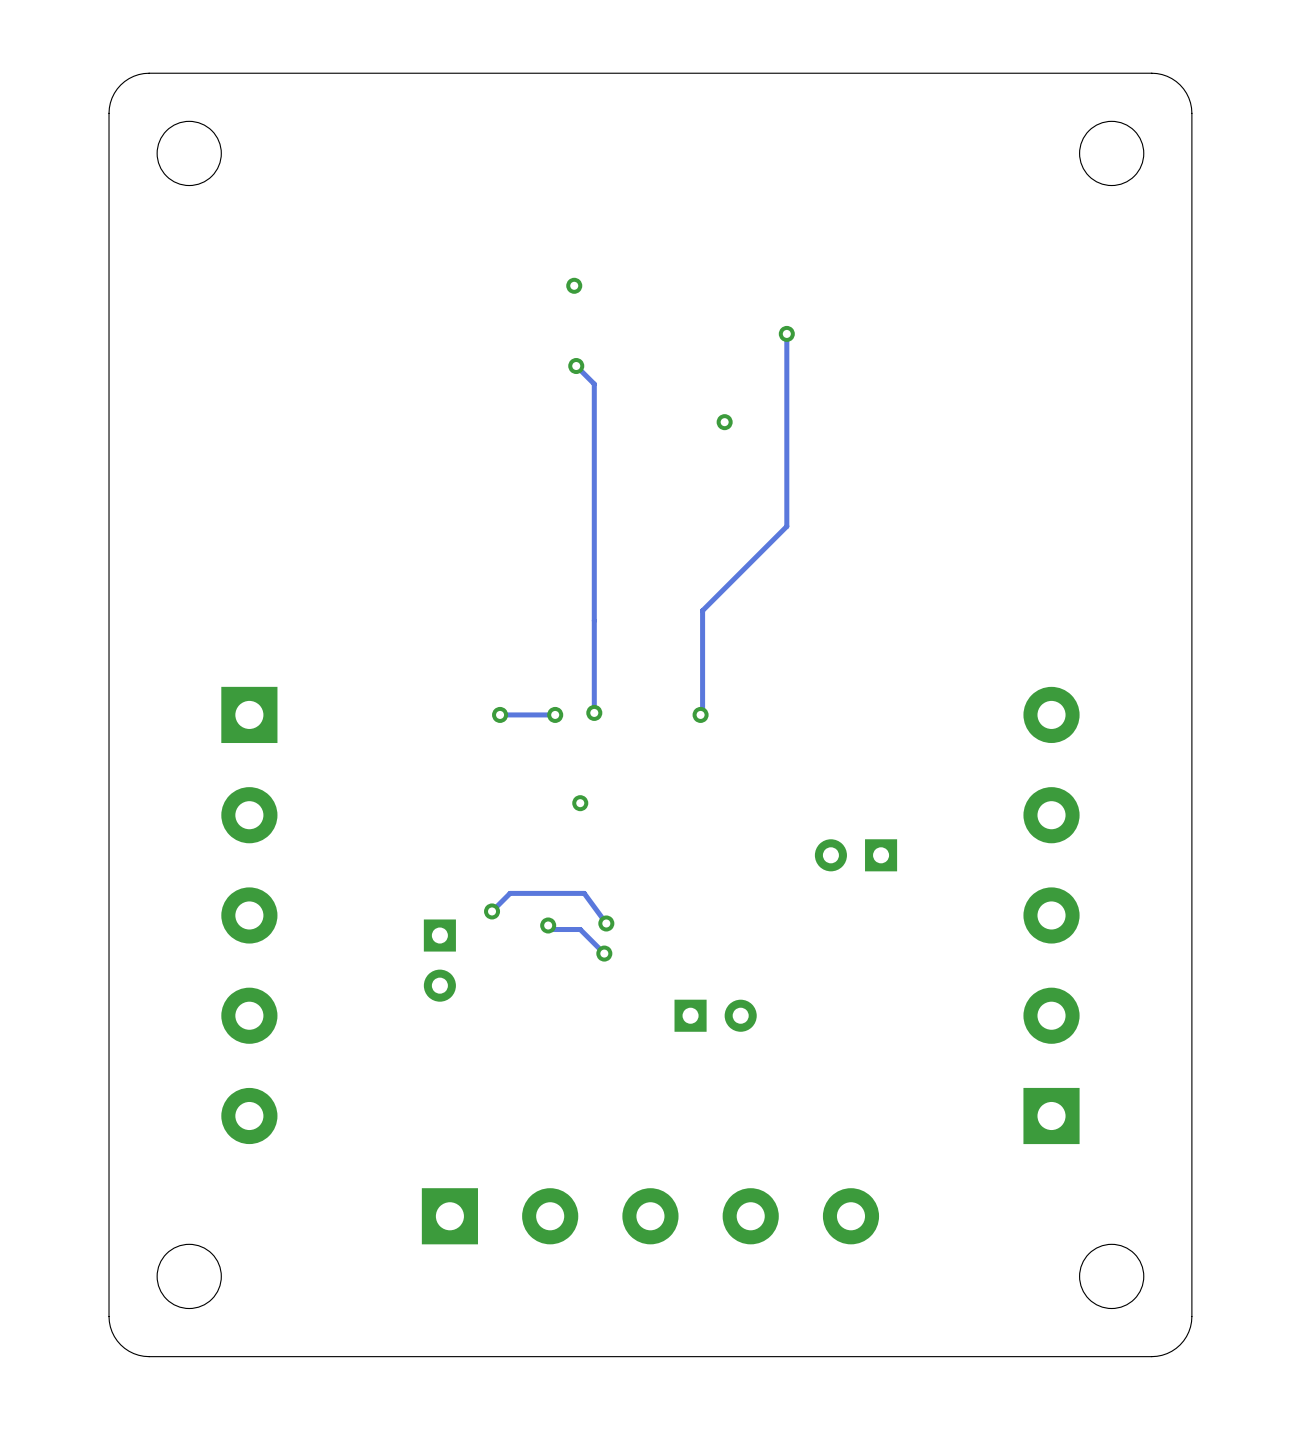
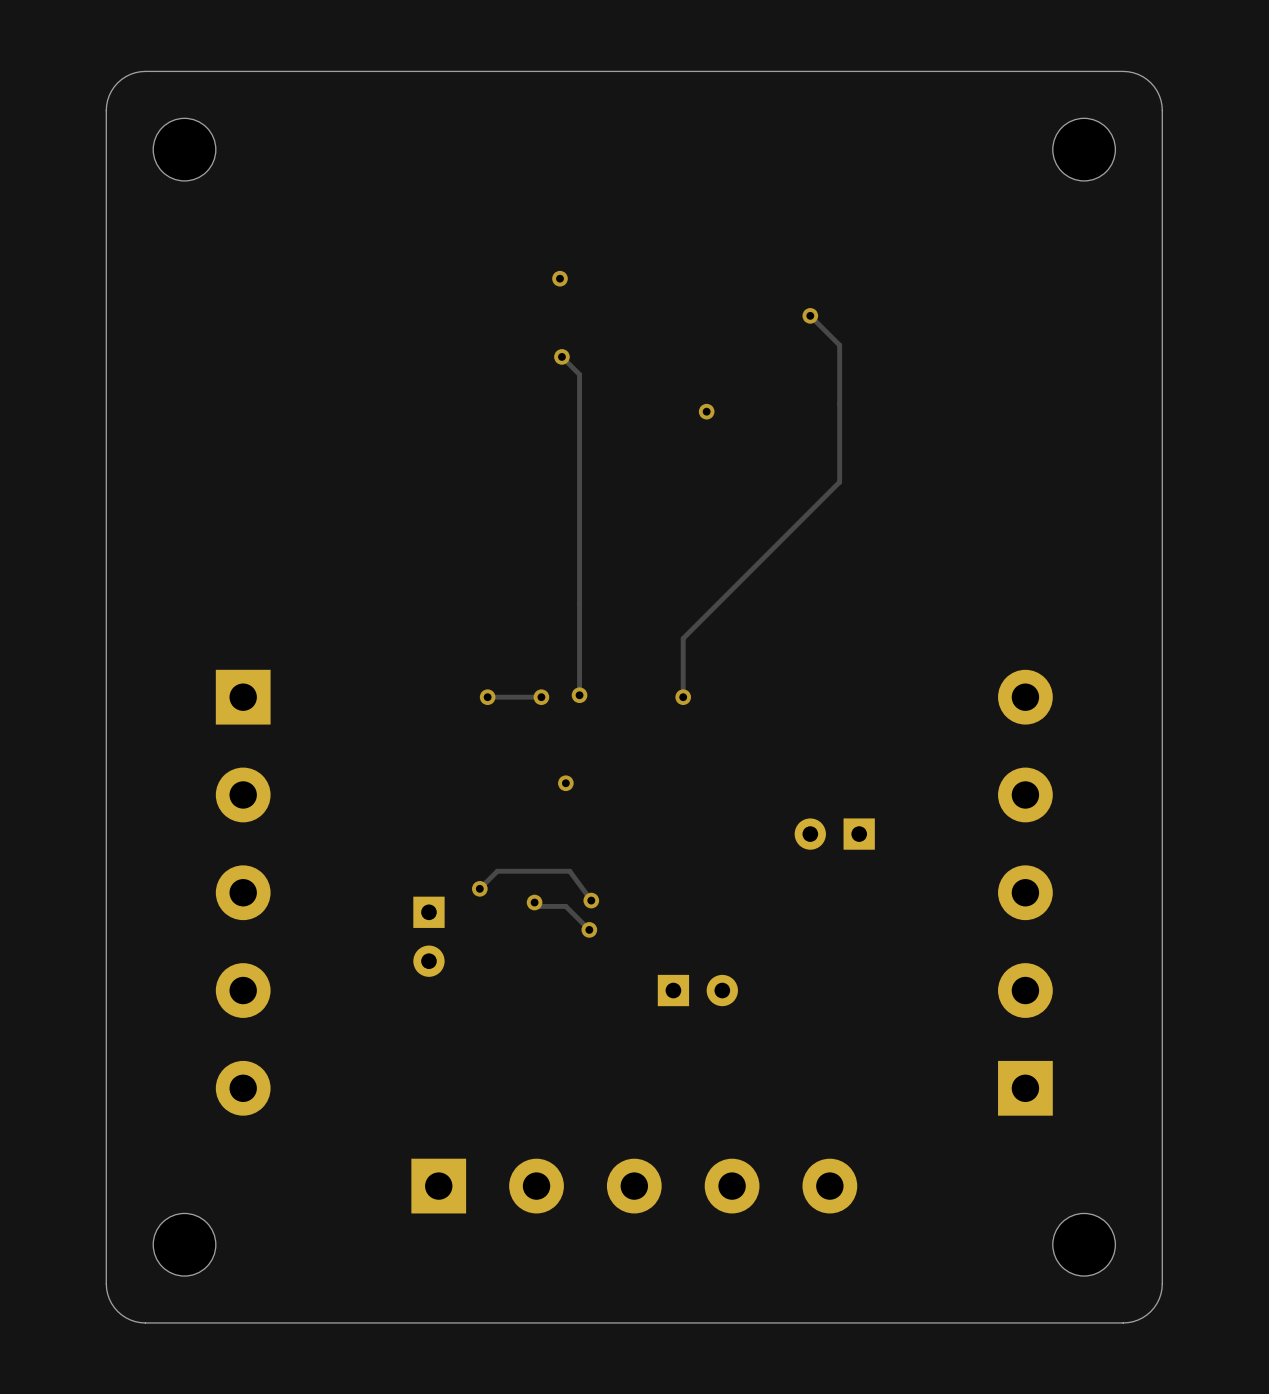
track: none -> (810, 315) (839, 345) (839, 482) (683, 638) (683, 697)
track: (786, 333) (786, 526) (702, 610) (702, 714) -> none
via position: (786, 333) -> (810, 315)

